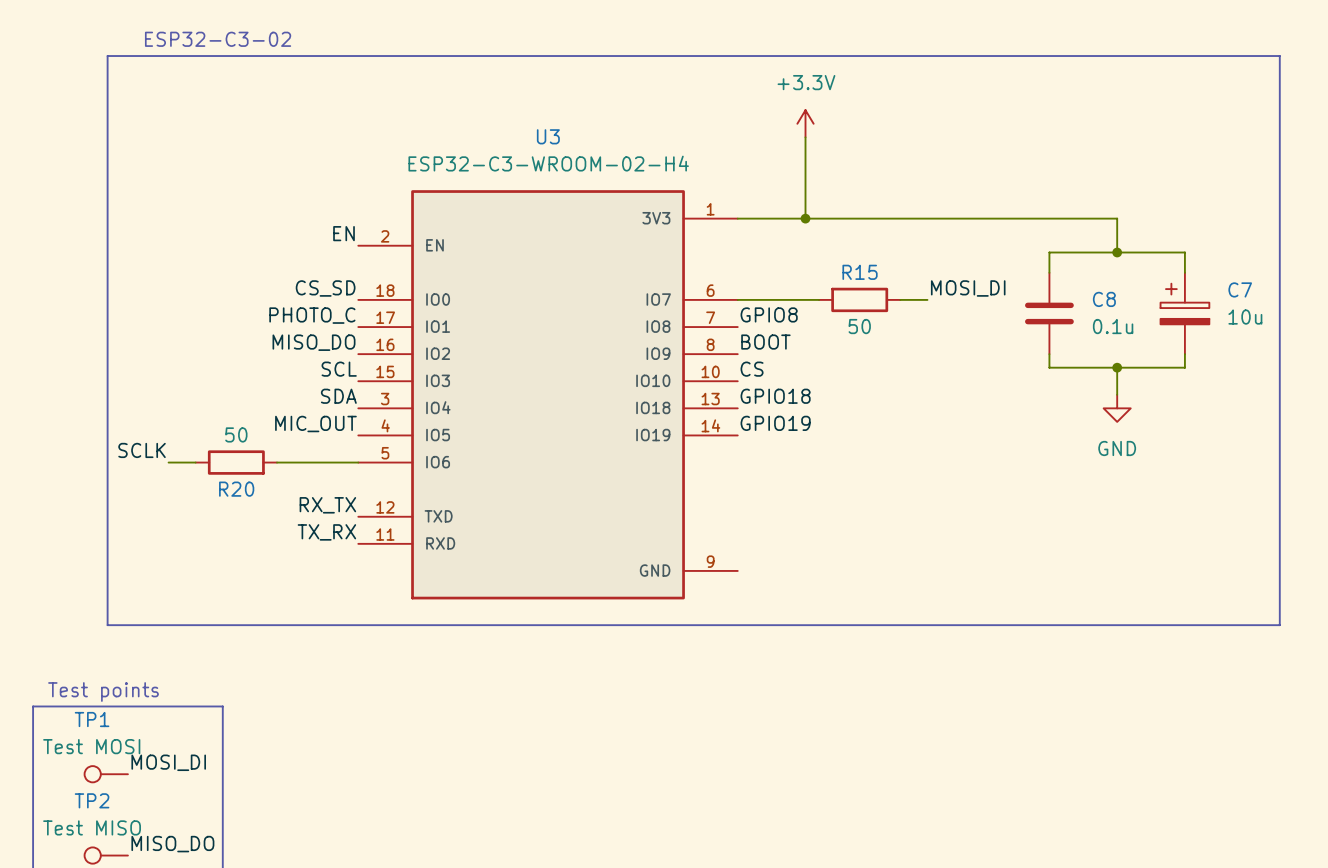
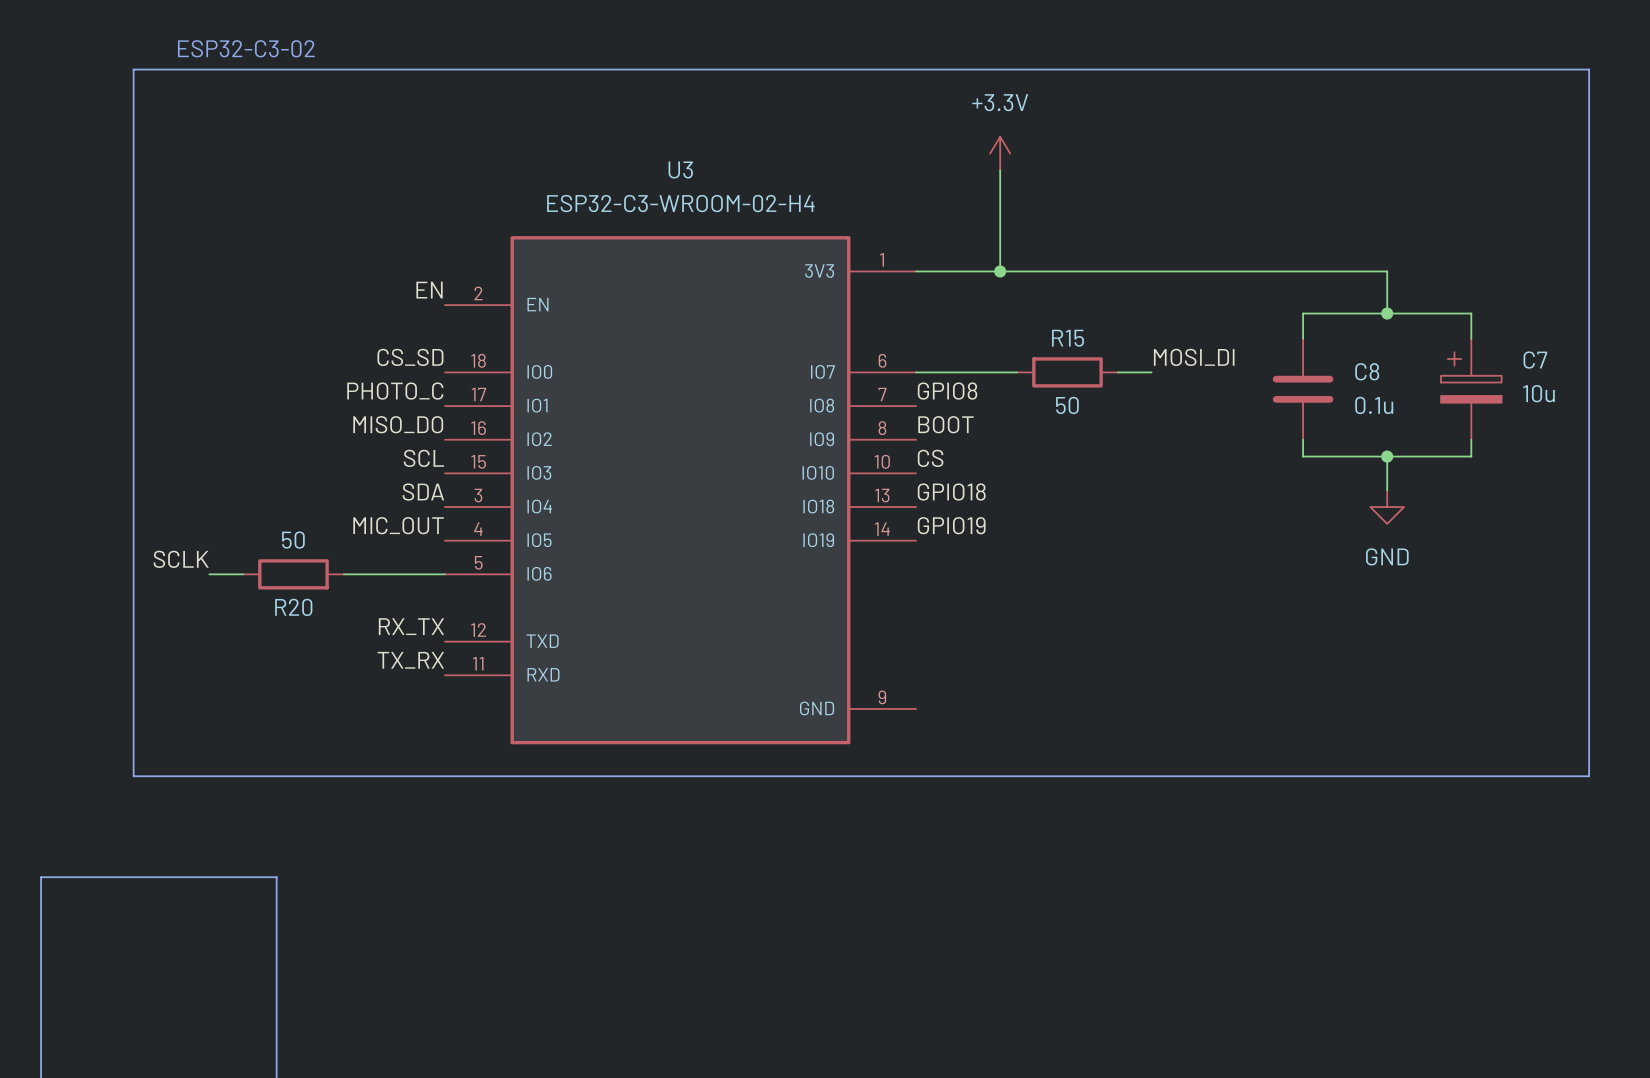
text: Test points (103, 692) -> none
label: MOSI_DI (168, 762) -> none
TP1: Test MOSI (106, 774) -> none
label: MISO_DO (172, 844) -> none
TP2: Test MISO (106, 855) -> none

